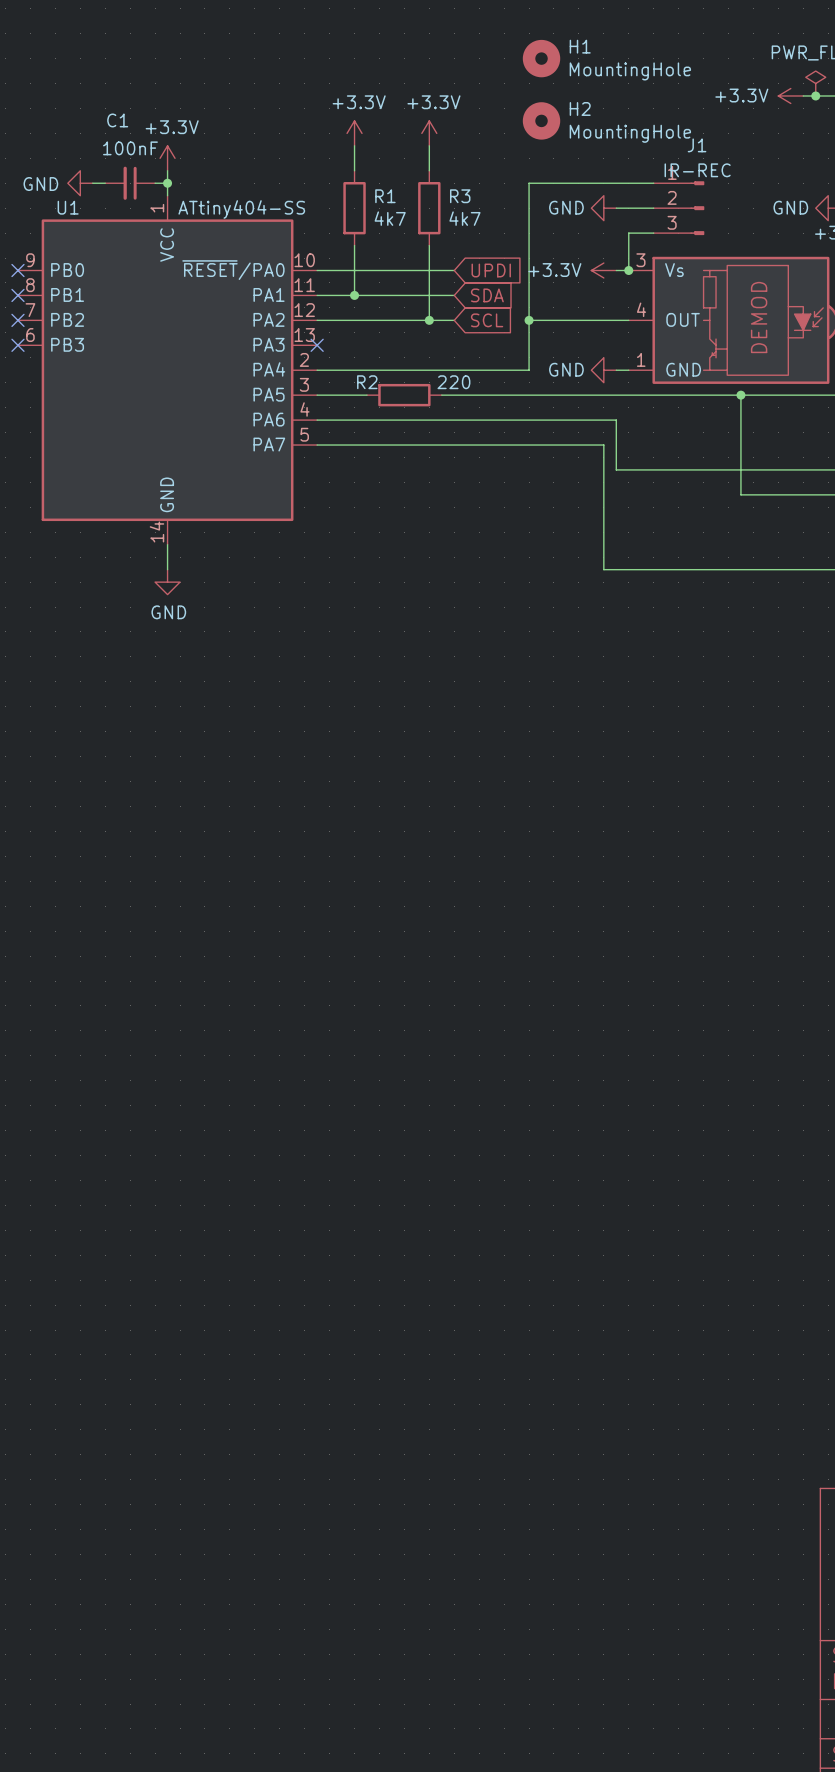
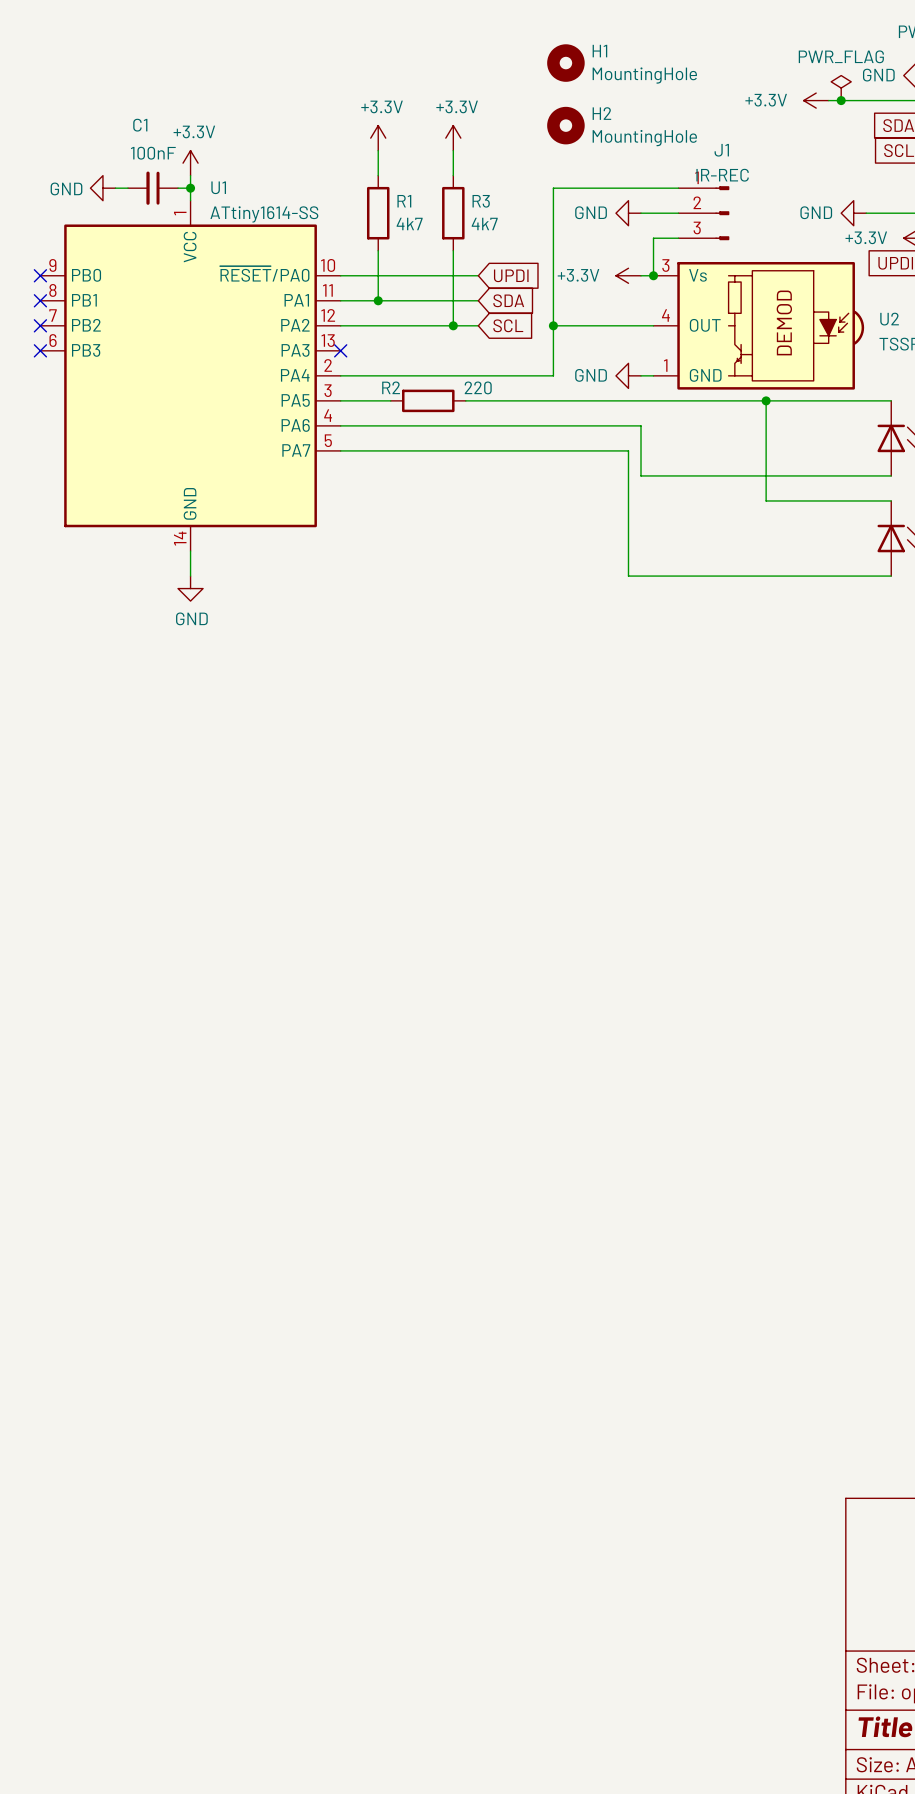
U1 name position: U1 (68, 207) -> U1 (218, 187)
U1 value: ATtiny404-SS (241, 209) -> ATtiny1614-SS (264, 214)

